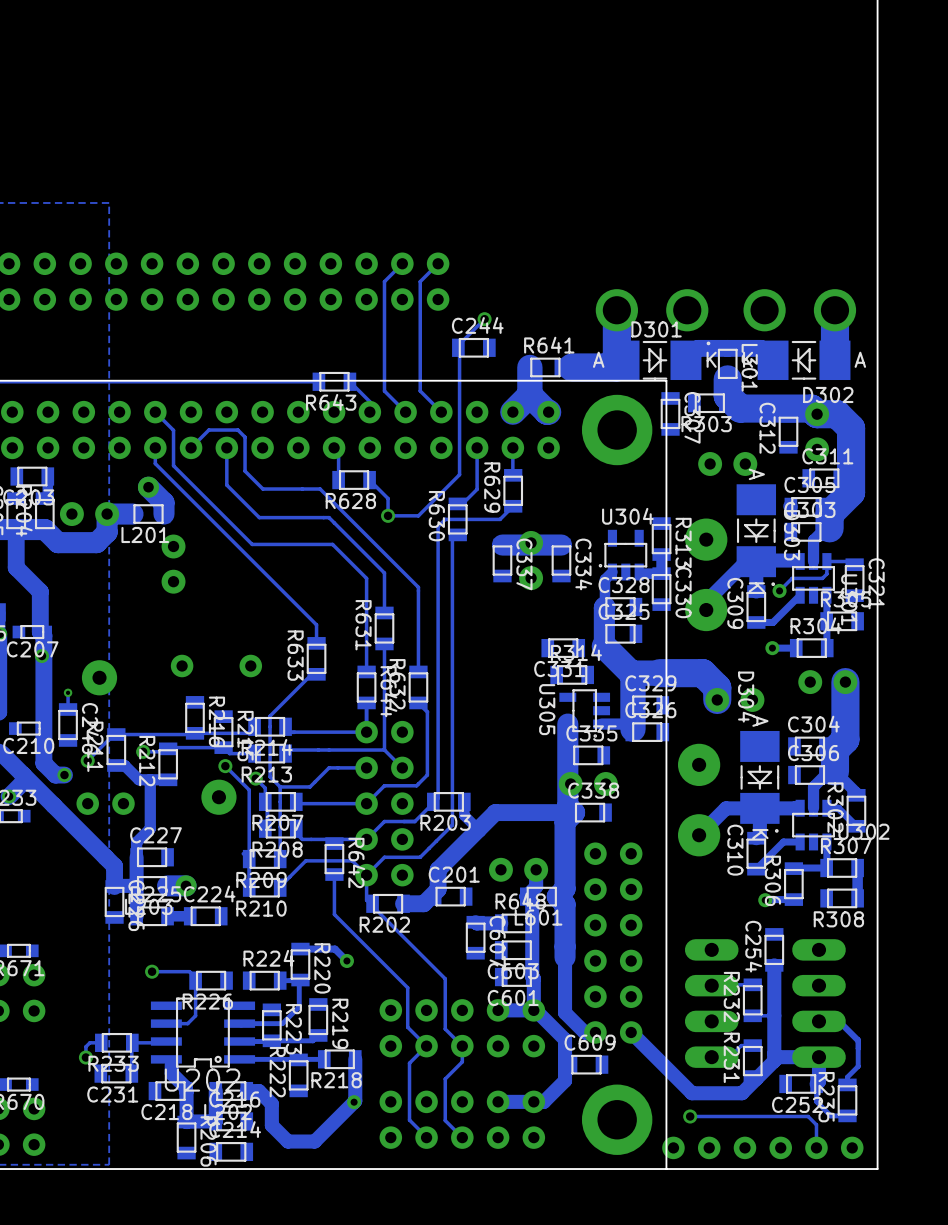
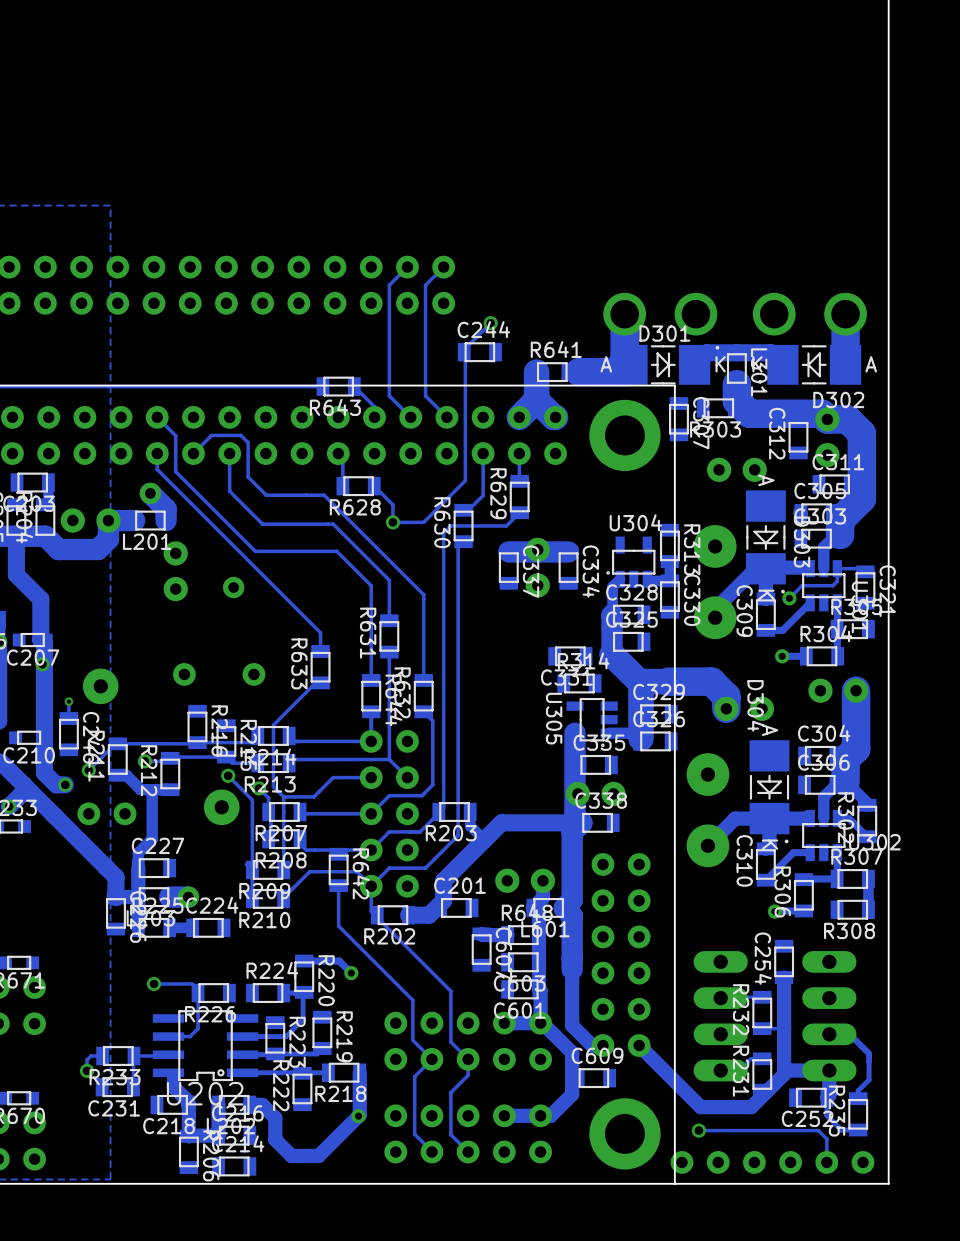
via: none -> (233, 587)

